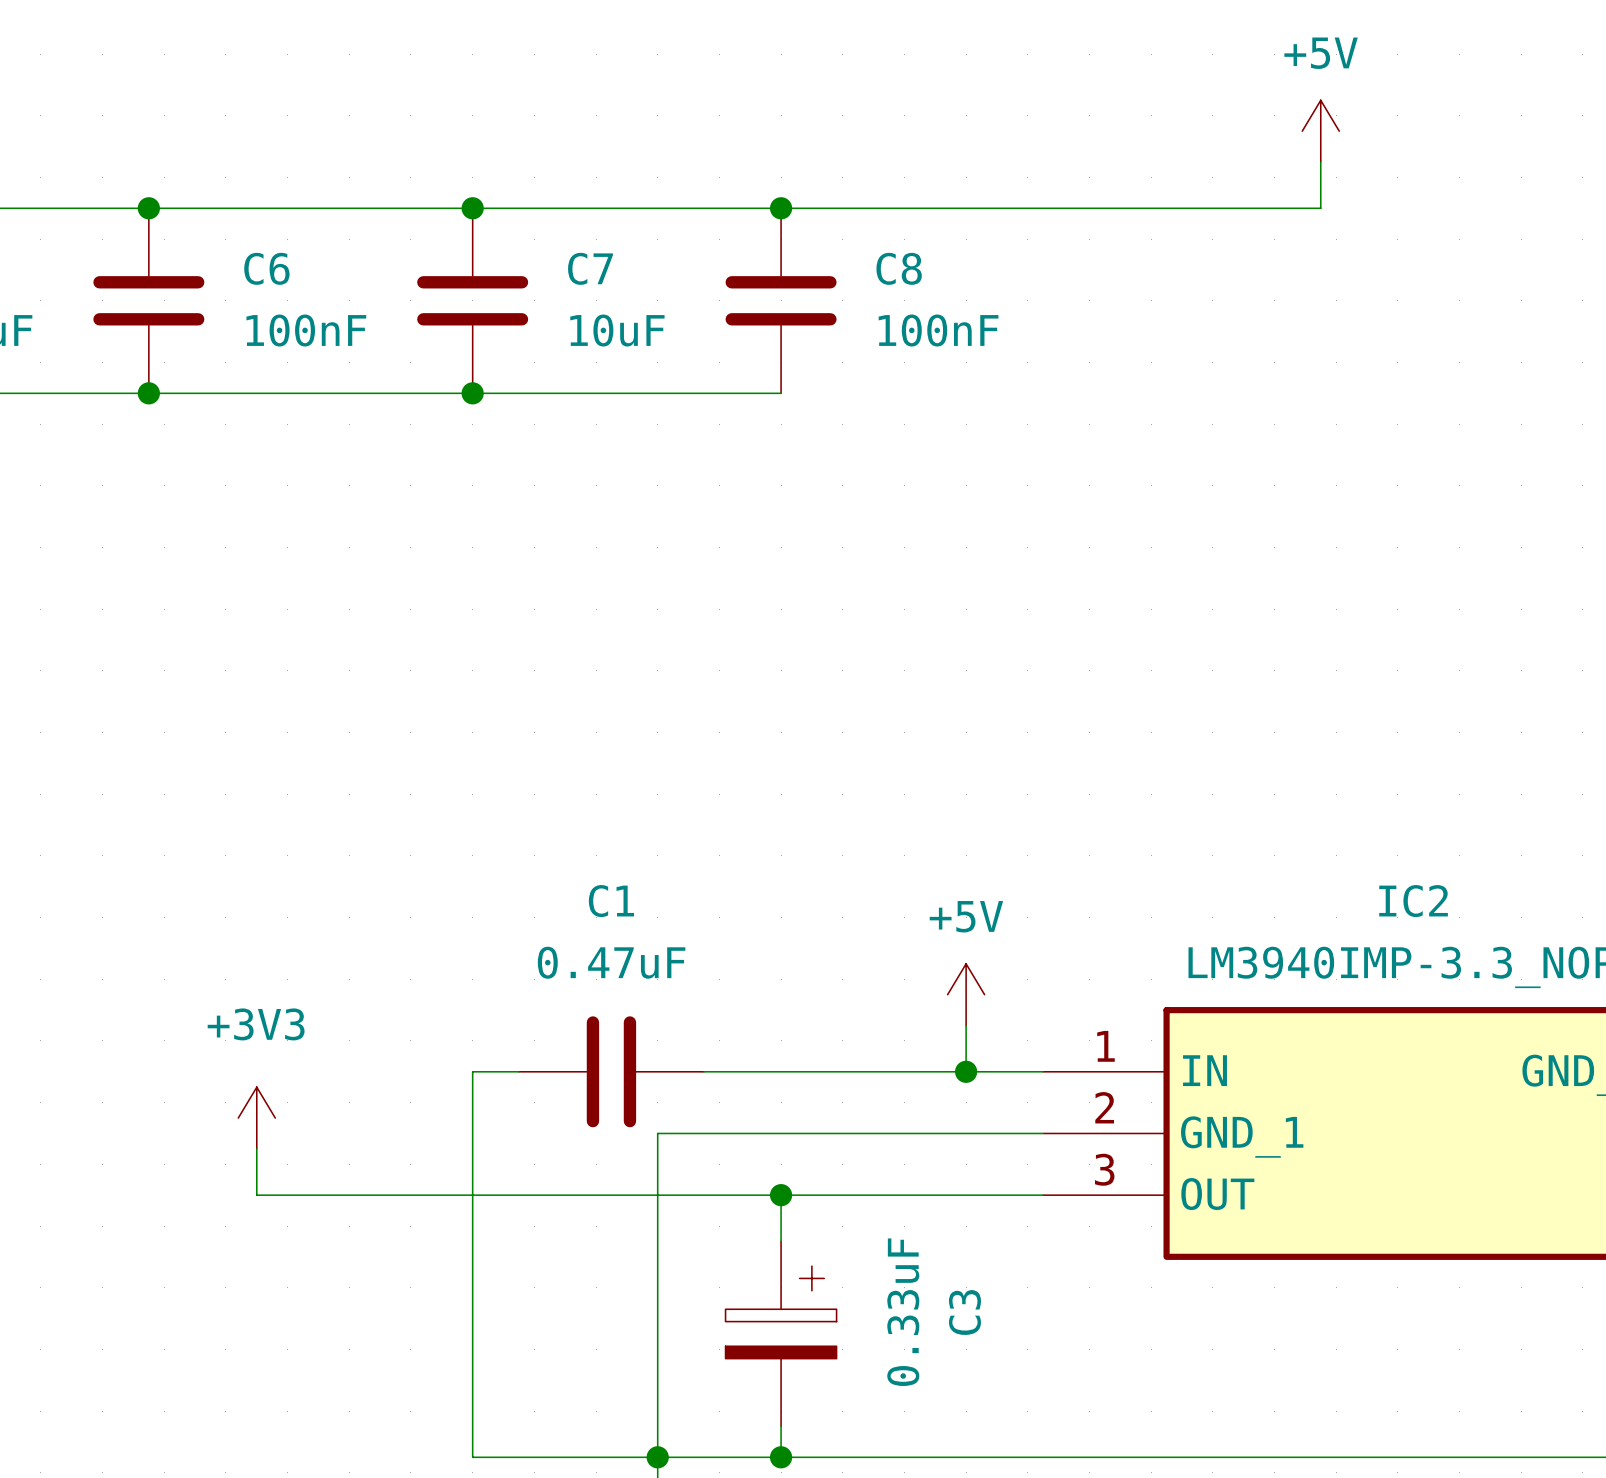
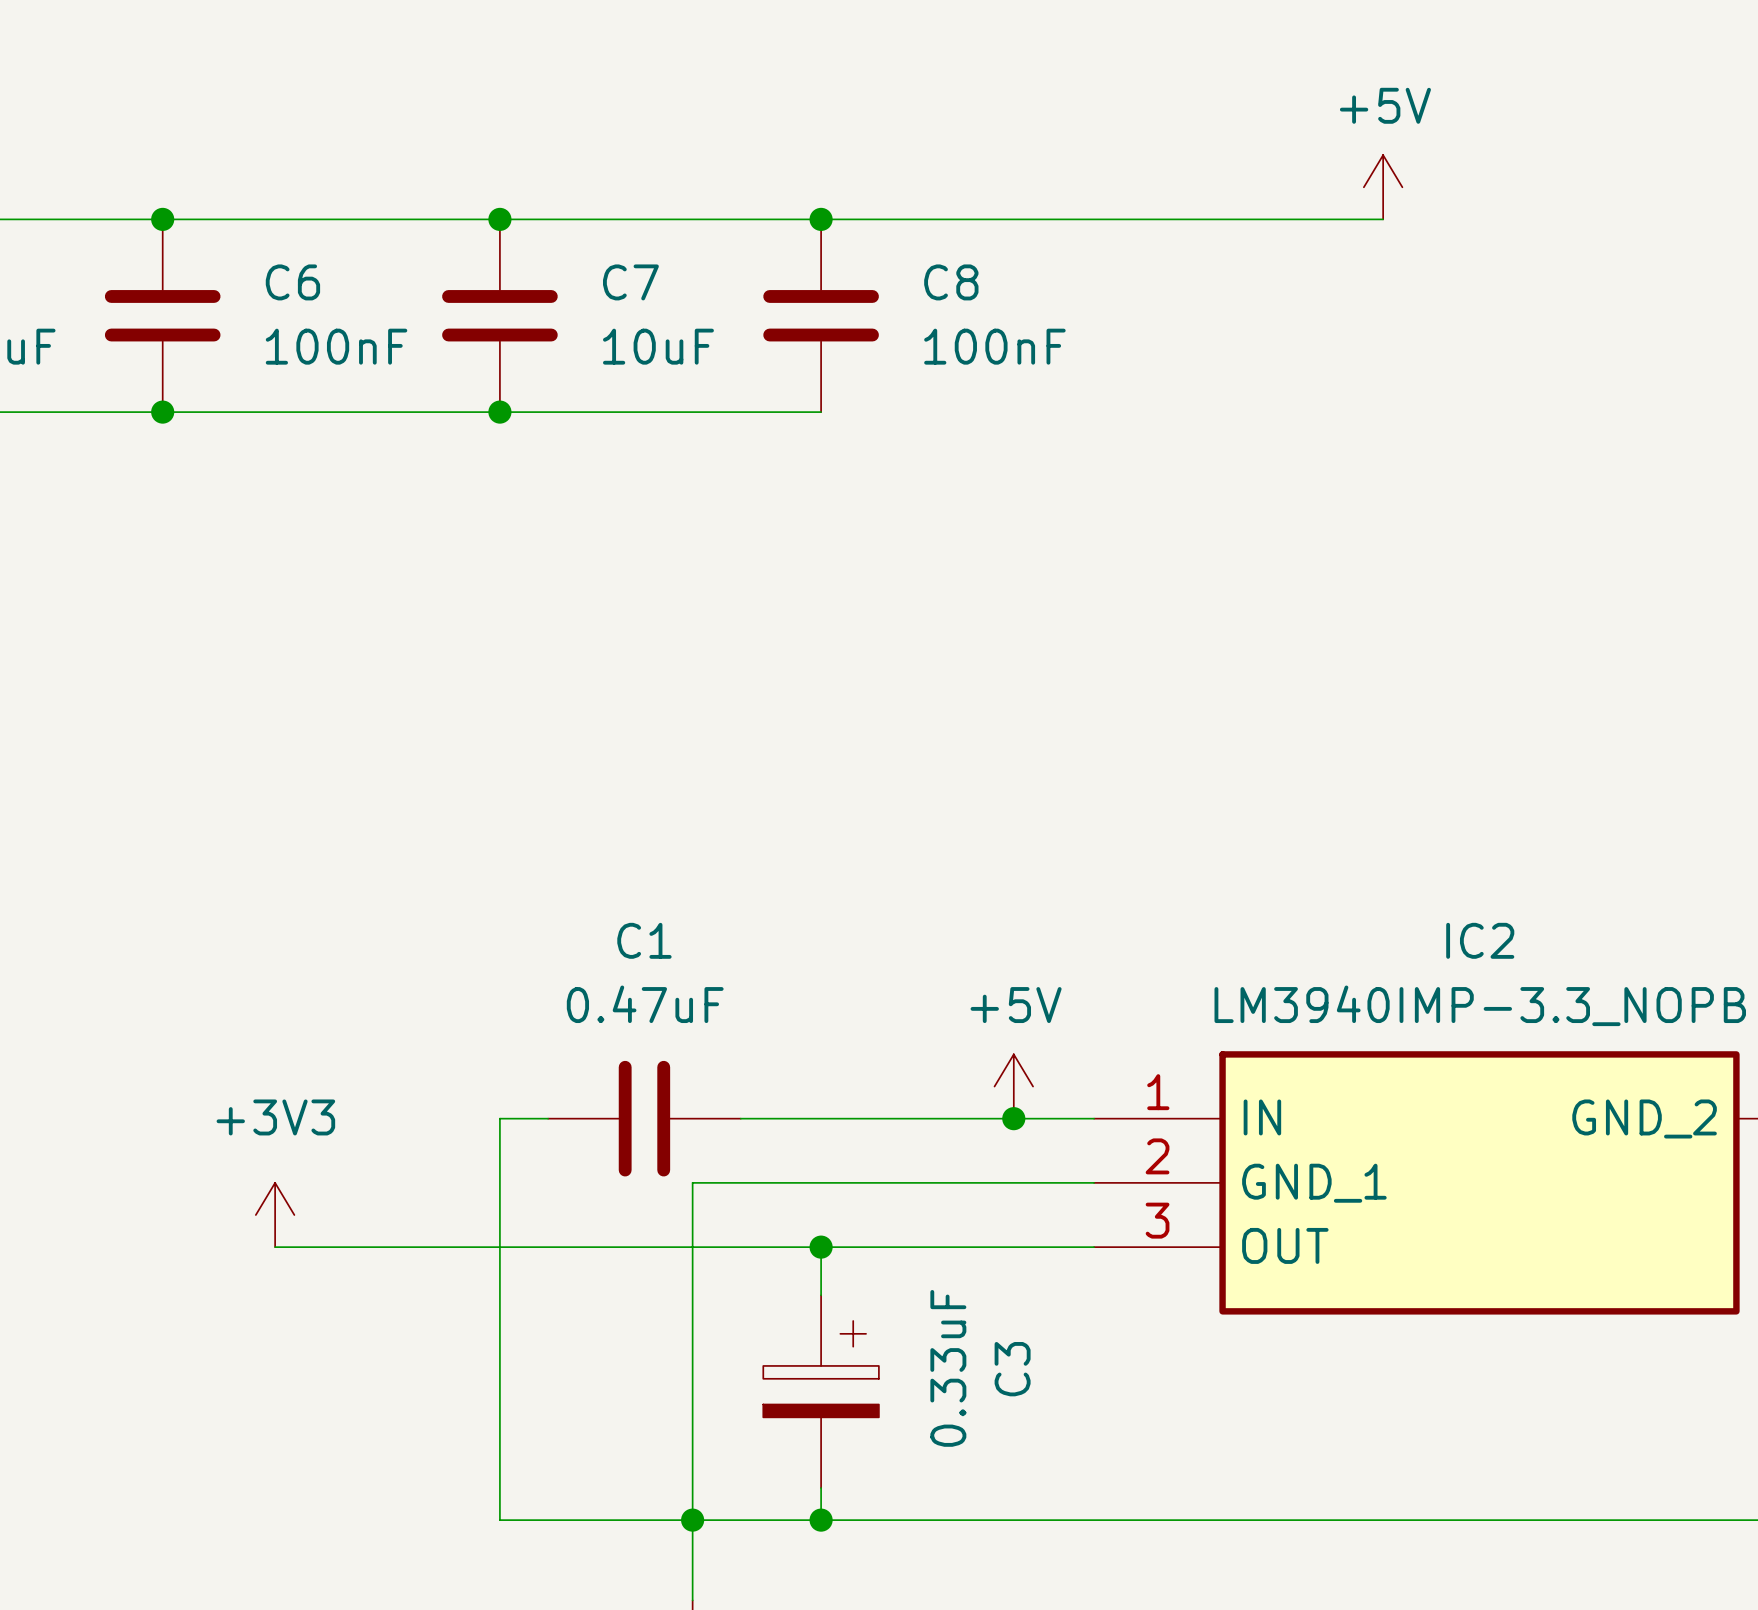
power symbol position: +5V (1320, 131) -> +5V (1383, 187)
power symbol position: +5V (966, 994) -> +5V (1013, 1086)
power symbol position: +3V3 (256, 1118) -> +3V3 (275, 1215)

